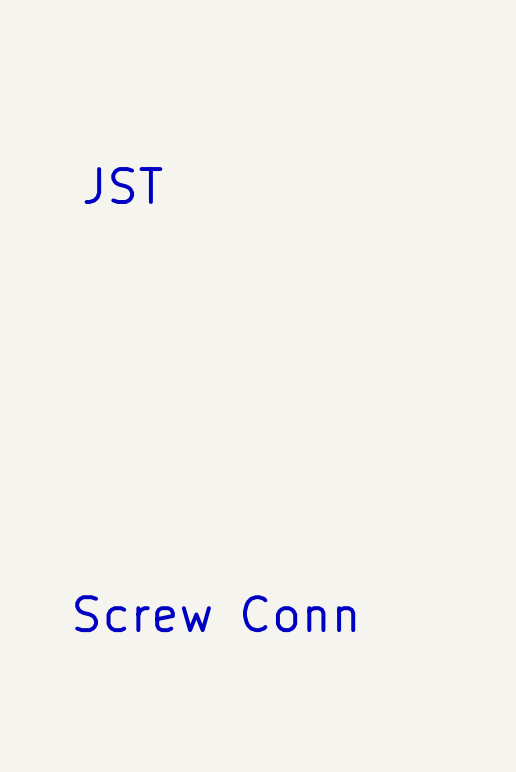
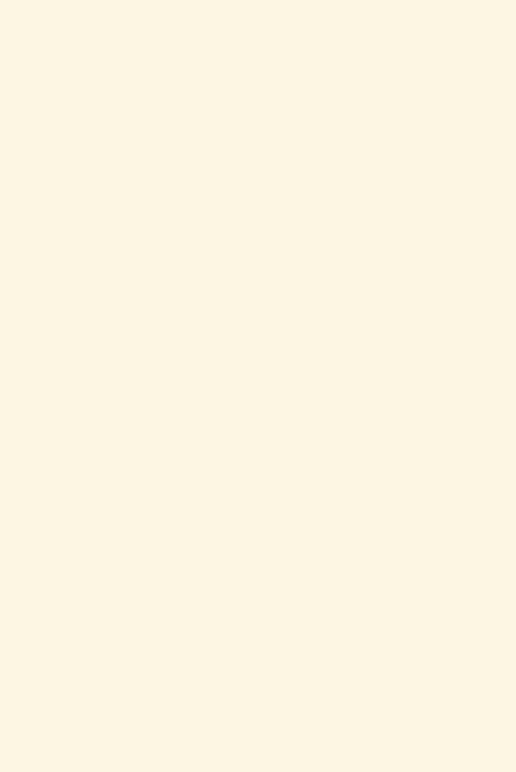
text: JST (123, 185) -> none
text: Screw Conn (215, 613) -> none

